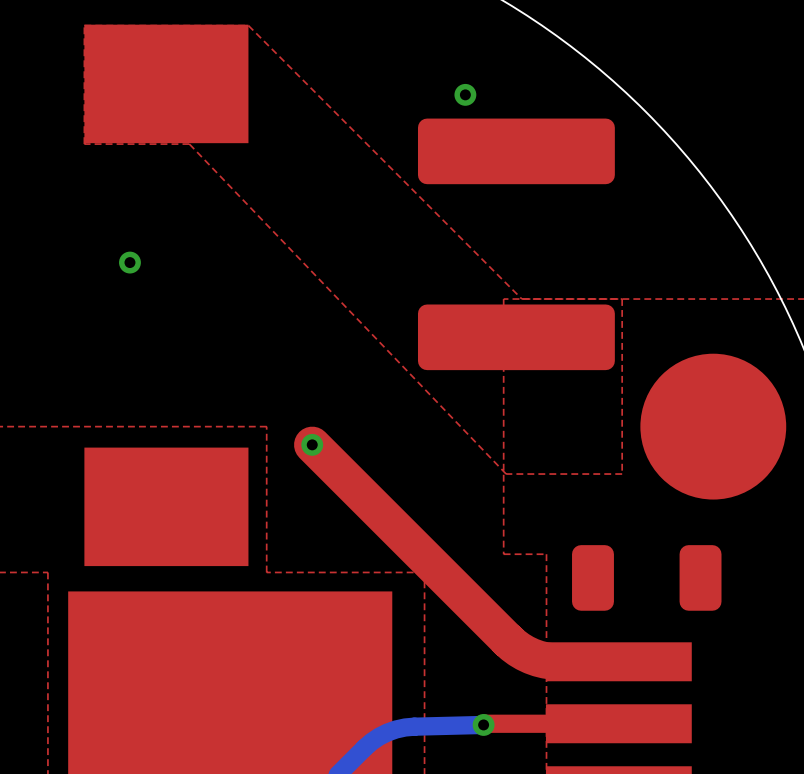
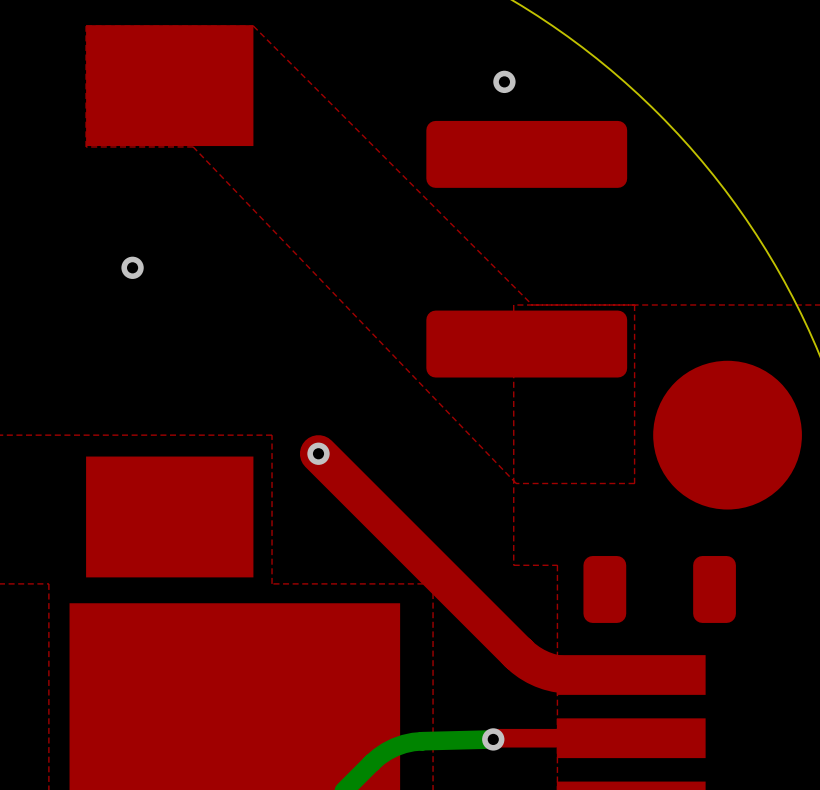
via position: (465, 94) -> (504, 81)

